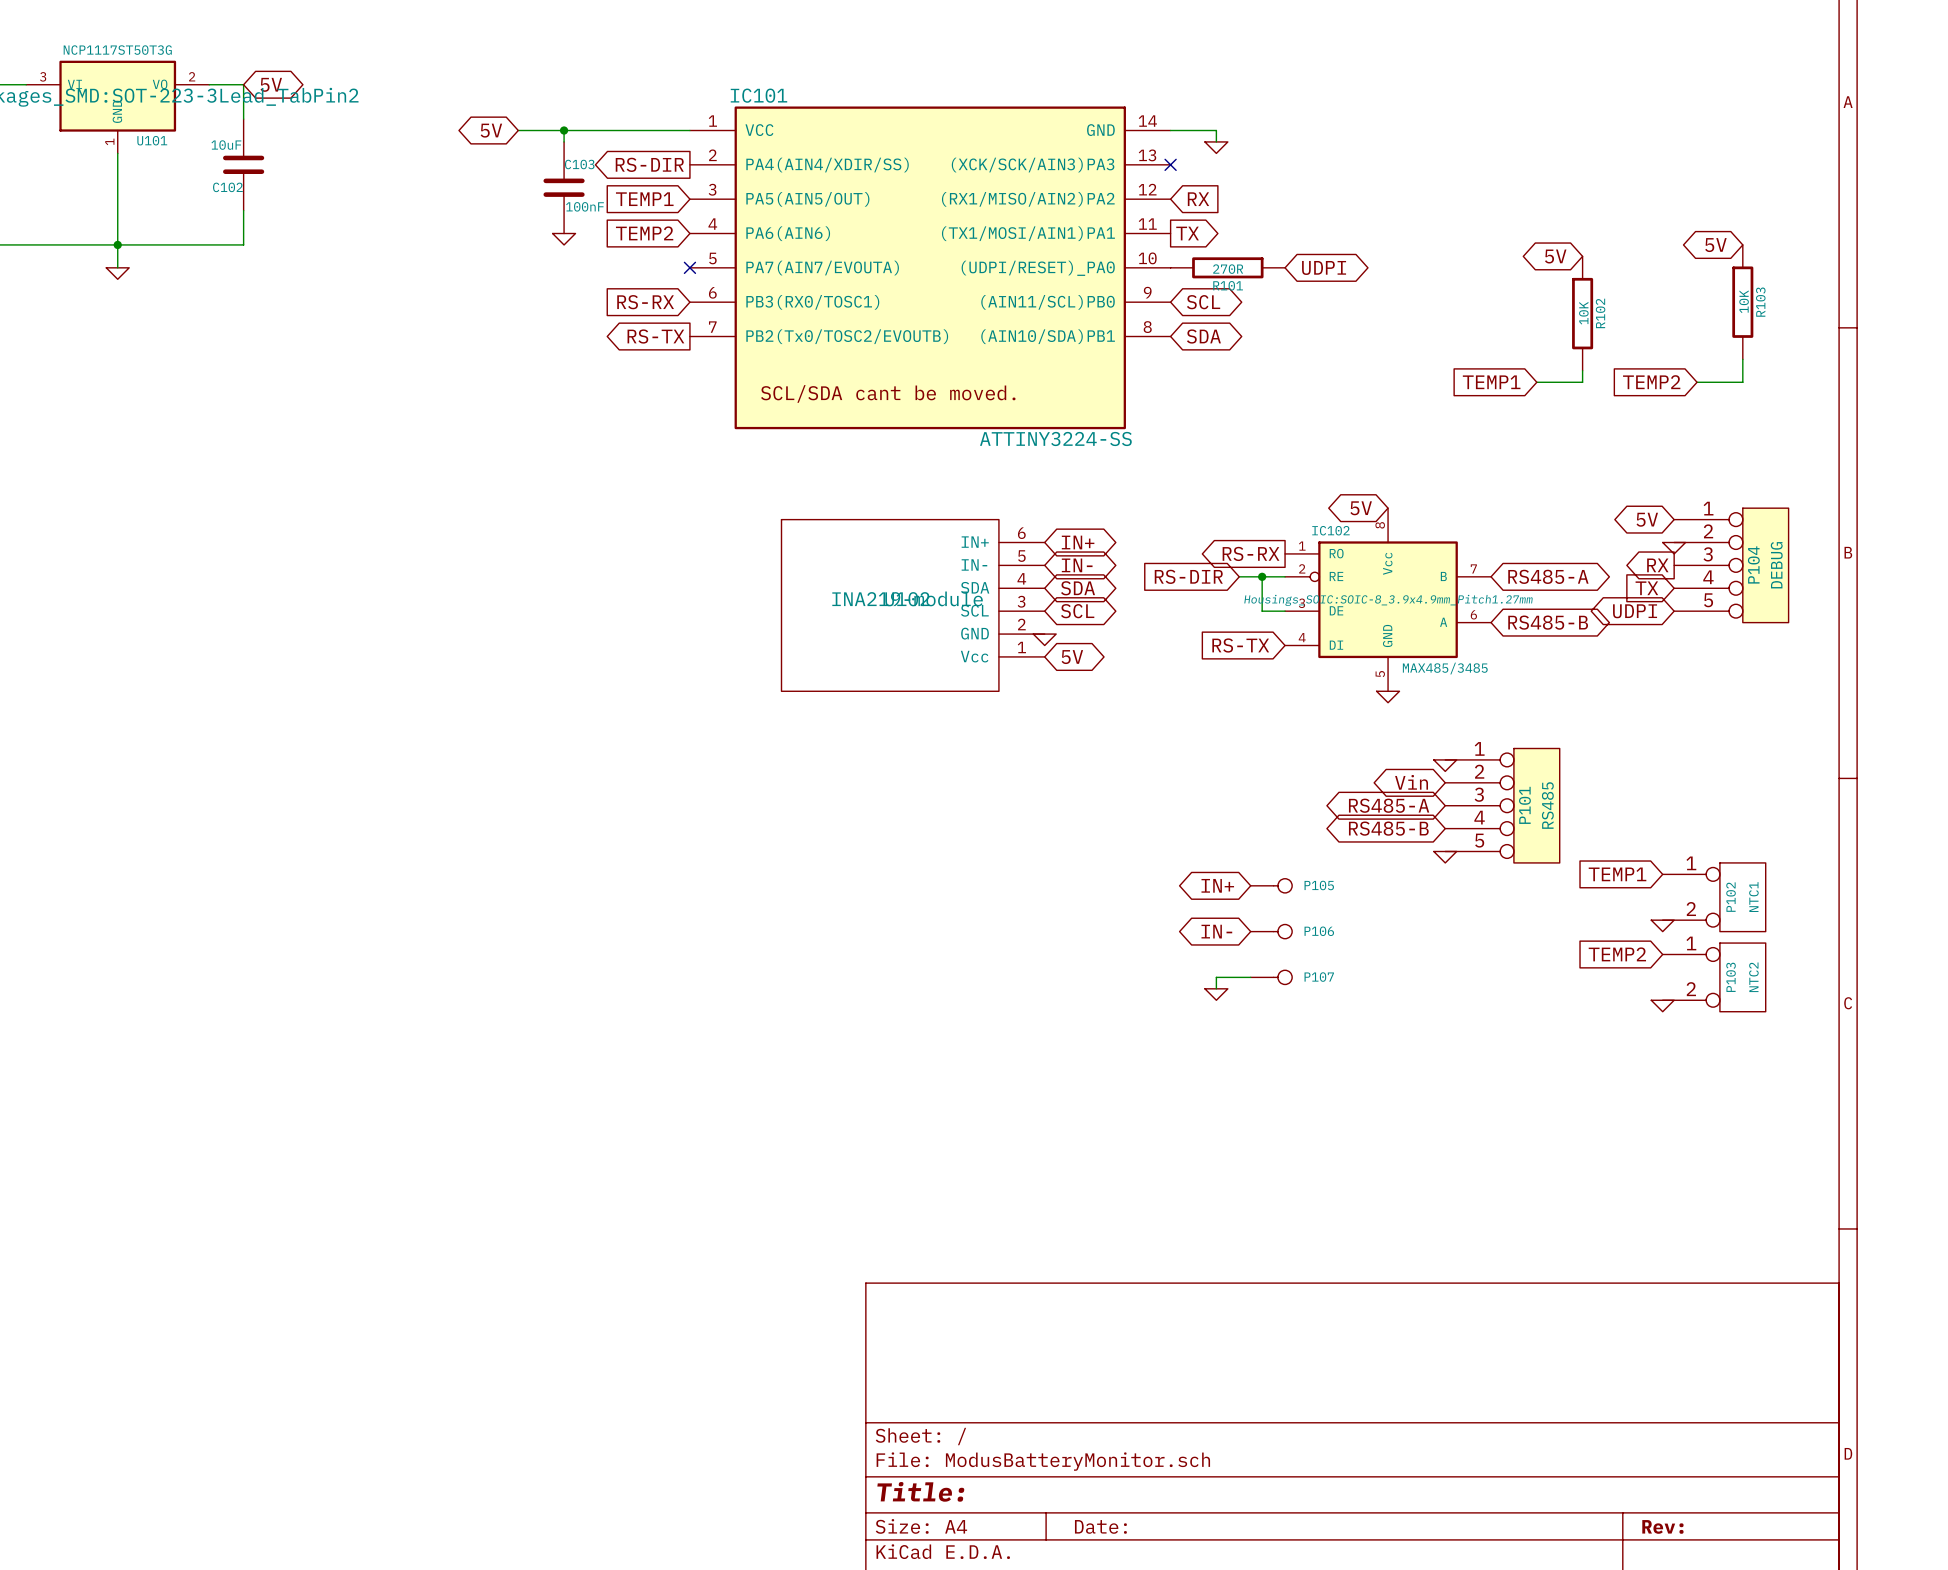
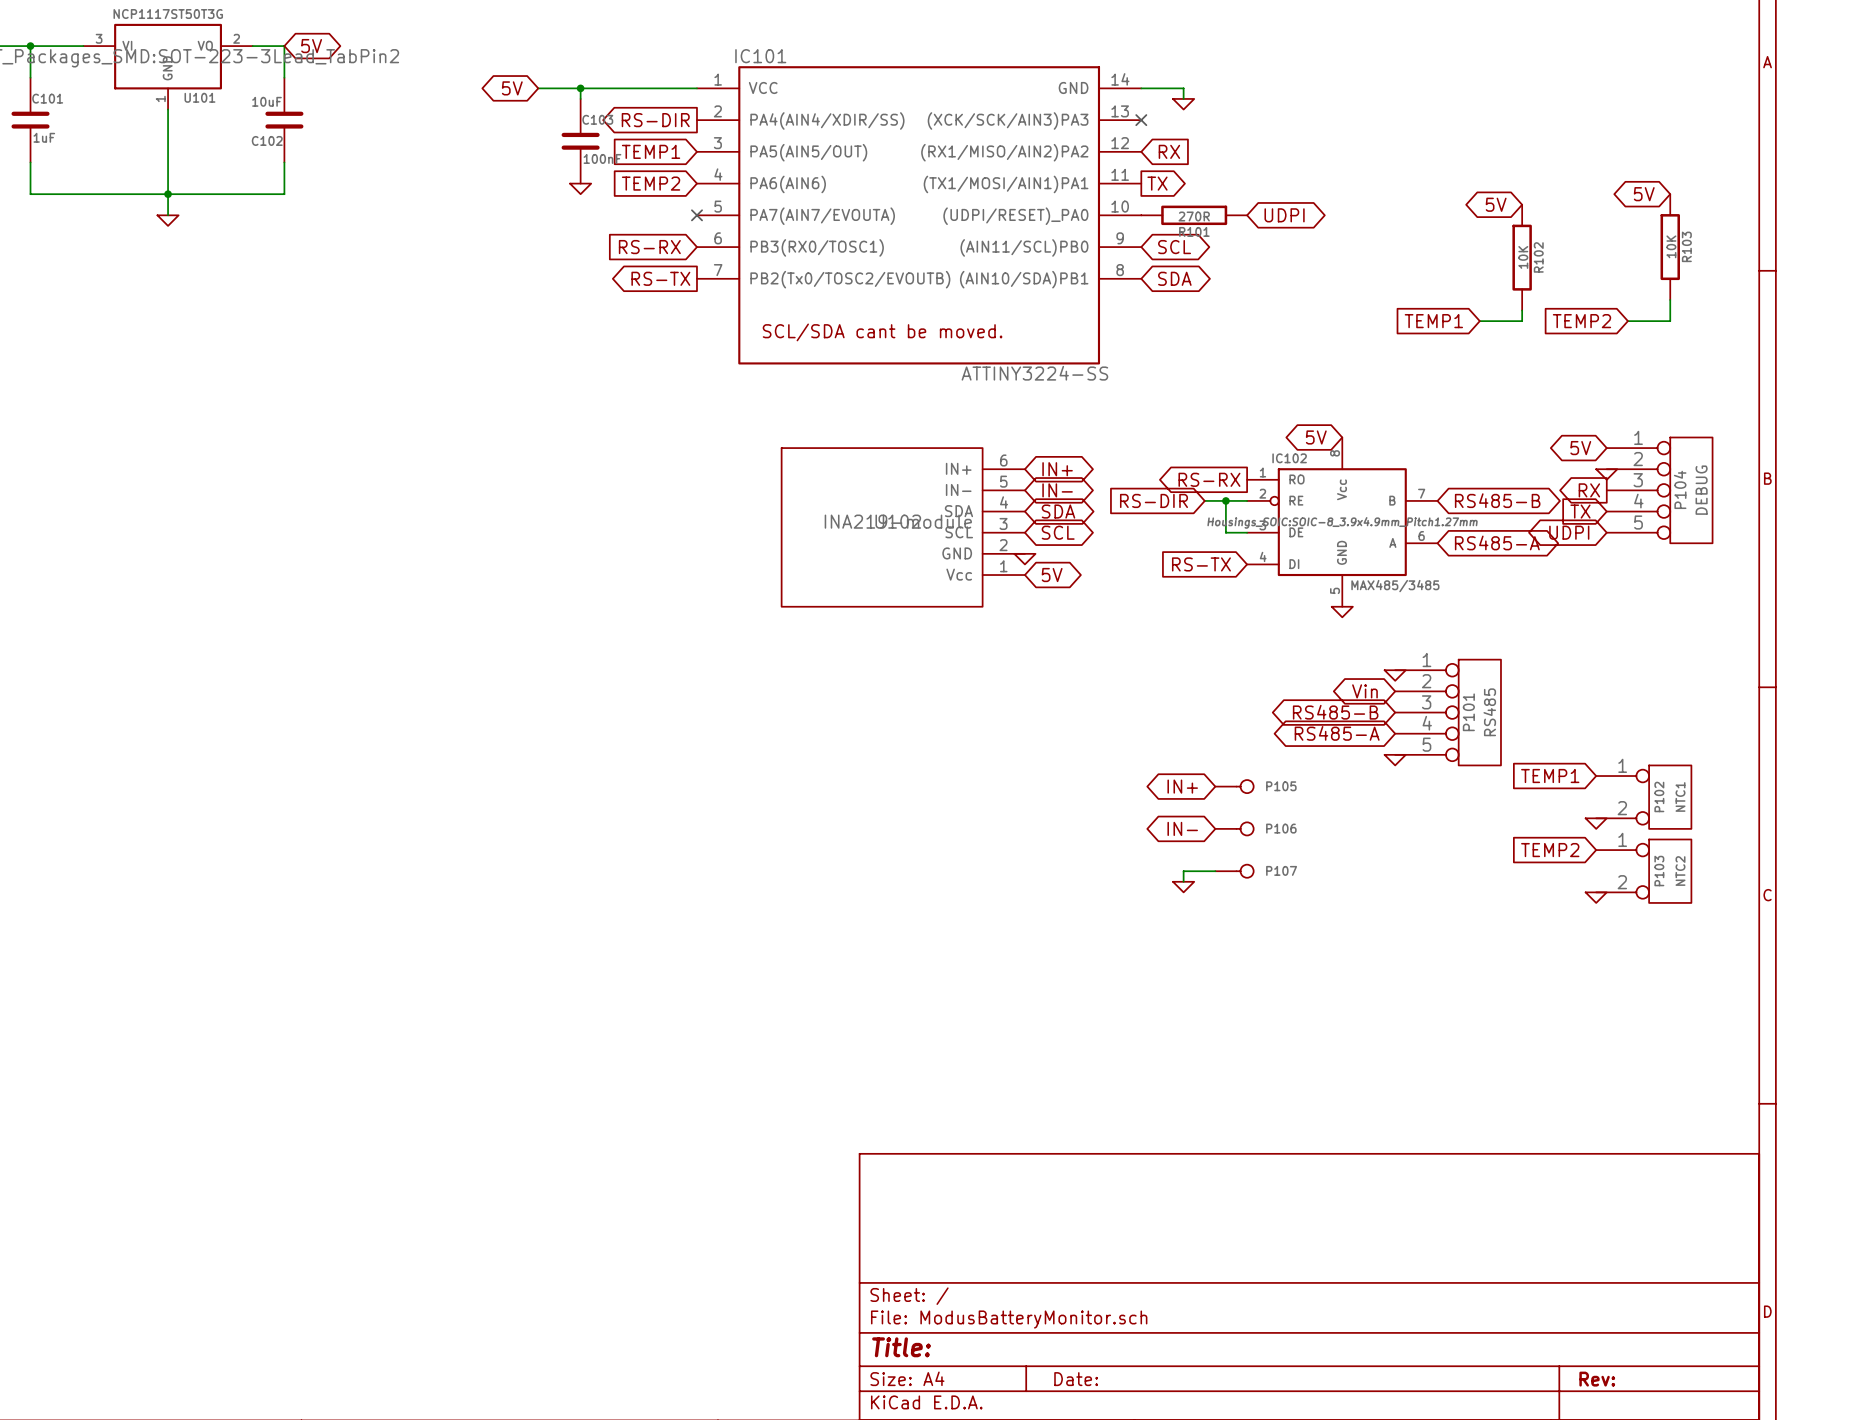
global label: RS485-A (1548, 576) -> RS485-B (1497, 500)
global label: RS485-B (1548, 622) -> RS485-A (1497, 542)
global label: RS485-A (1389, 805) -> RS485-B (1335, 712)
global label: RS485-B (1388, 828) -> RS485-A (1337, 733)

